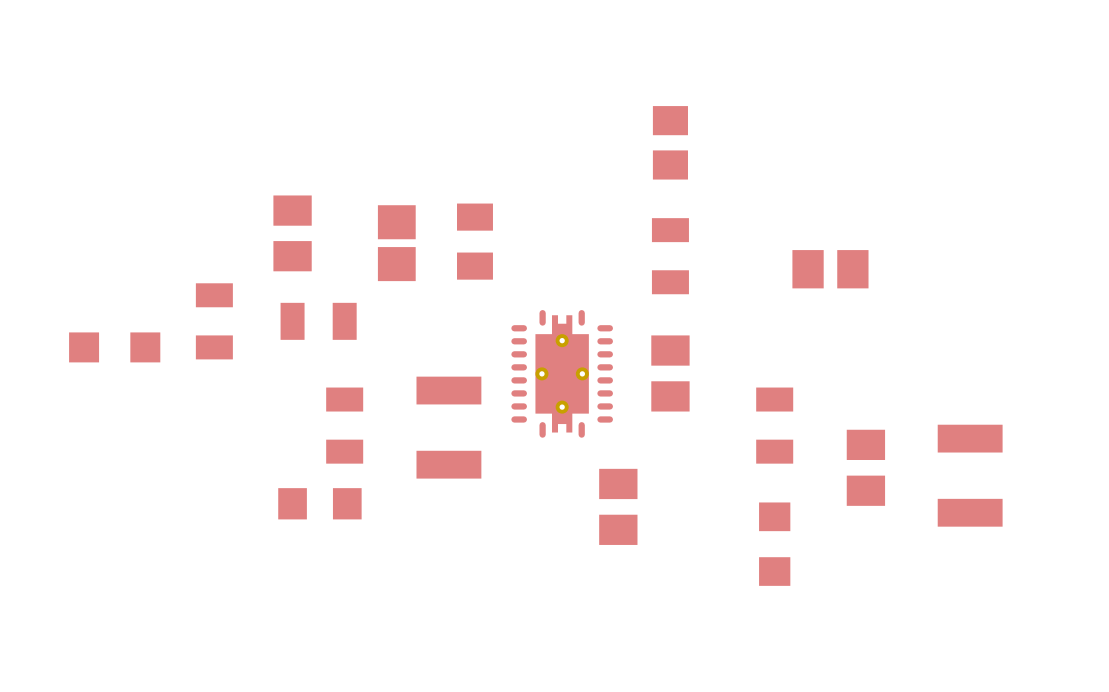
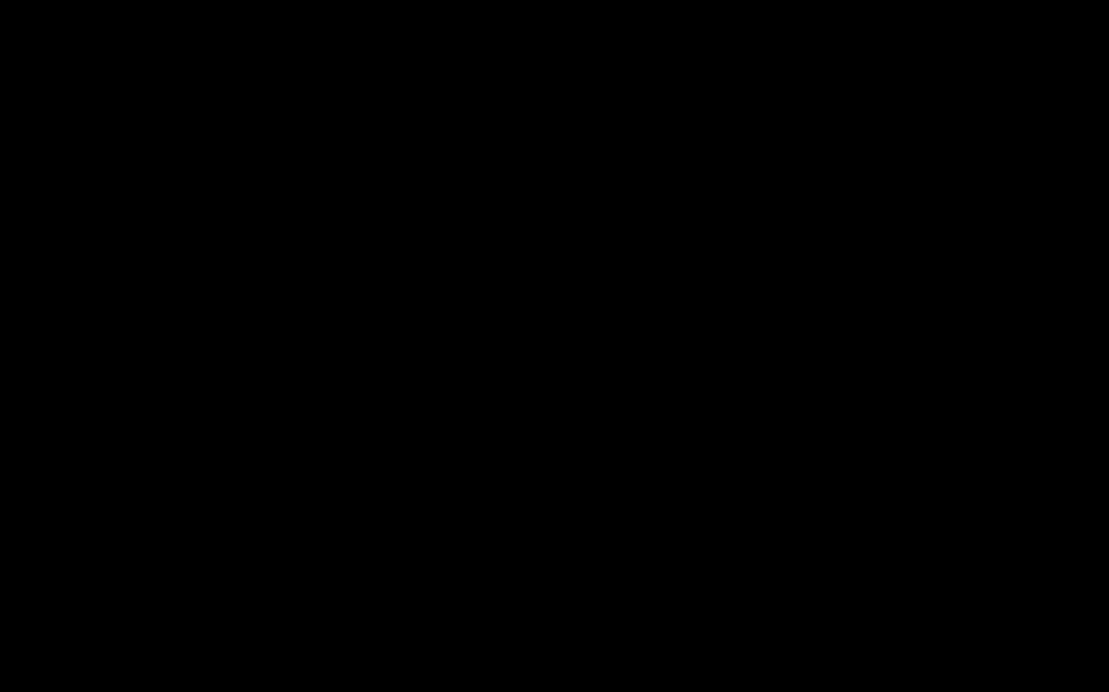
part: (670, 142) -> none
part: (292, 233) -> none
part: (474, 241) -> none
part: (396, 243) -> none
part: (670, 256) -> none
part: (830, 269) -> none
part: (214, 321) -> none
part: (318, 321) -> none
part: (114, 347) -> none
part: (562, 373) -> none
part: (670, 373) -> none
part: (344, 425) -> none
part: (774, 425) -> none
part: (448, 427) -> none
part: (865, 467) -> none
part: (970, 475) -> none
part: (319, 503) -> none
part: (618, 506) -> none
part: (774, 544) -> none

